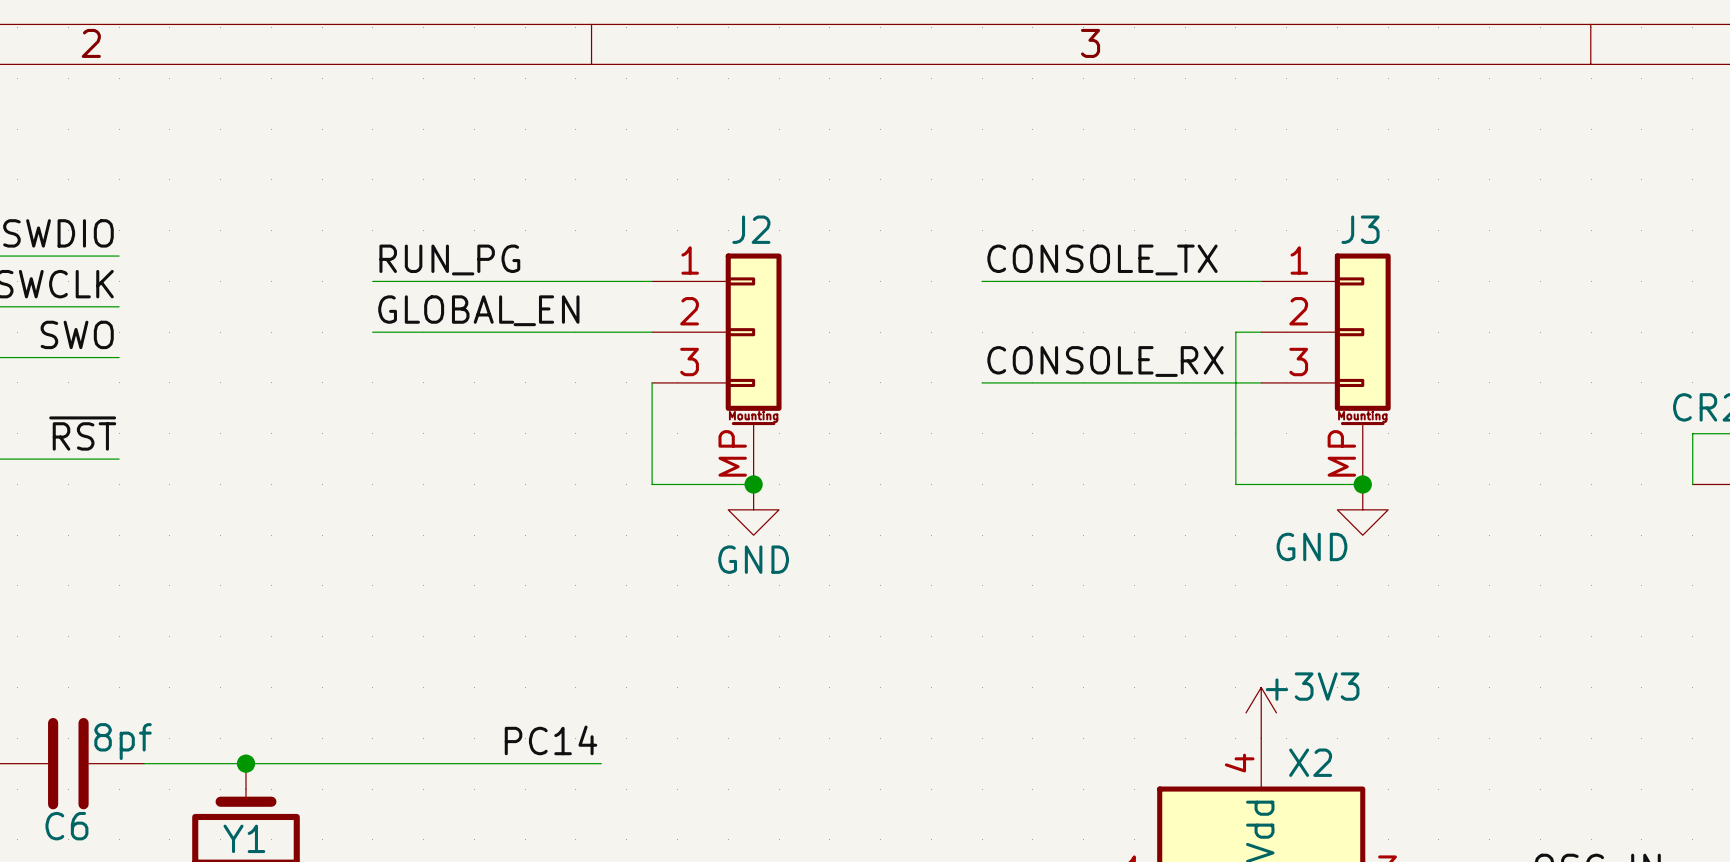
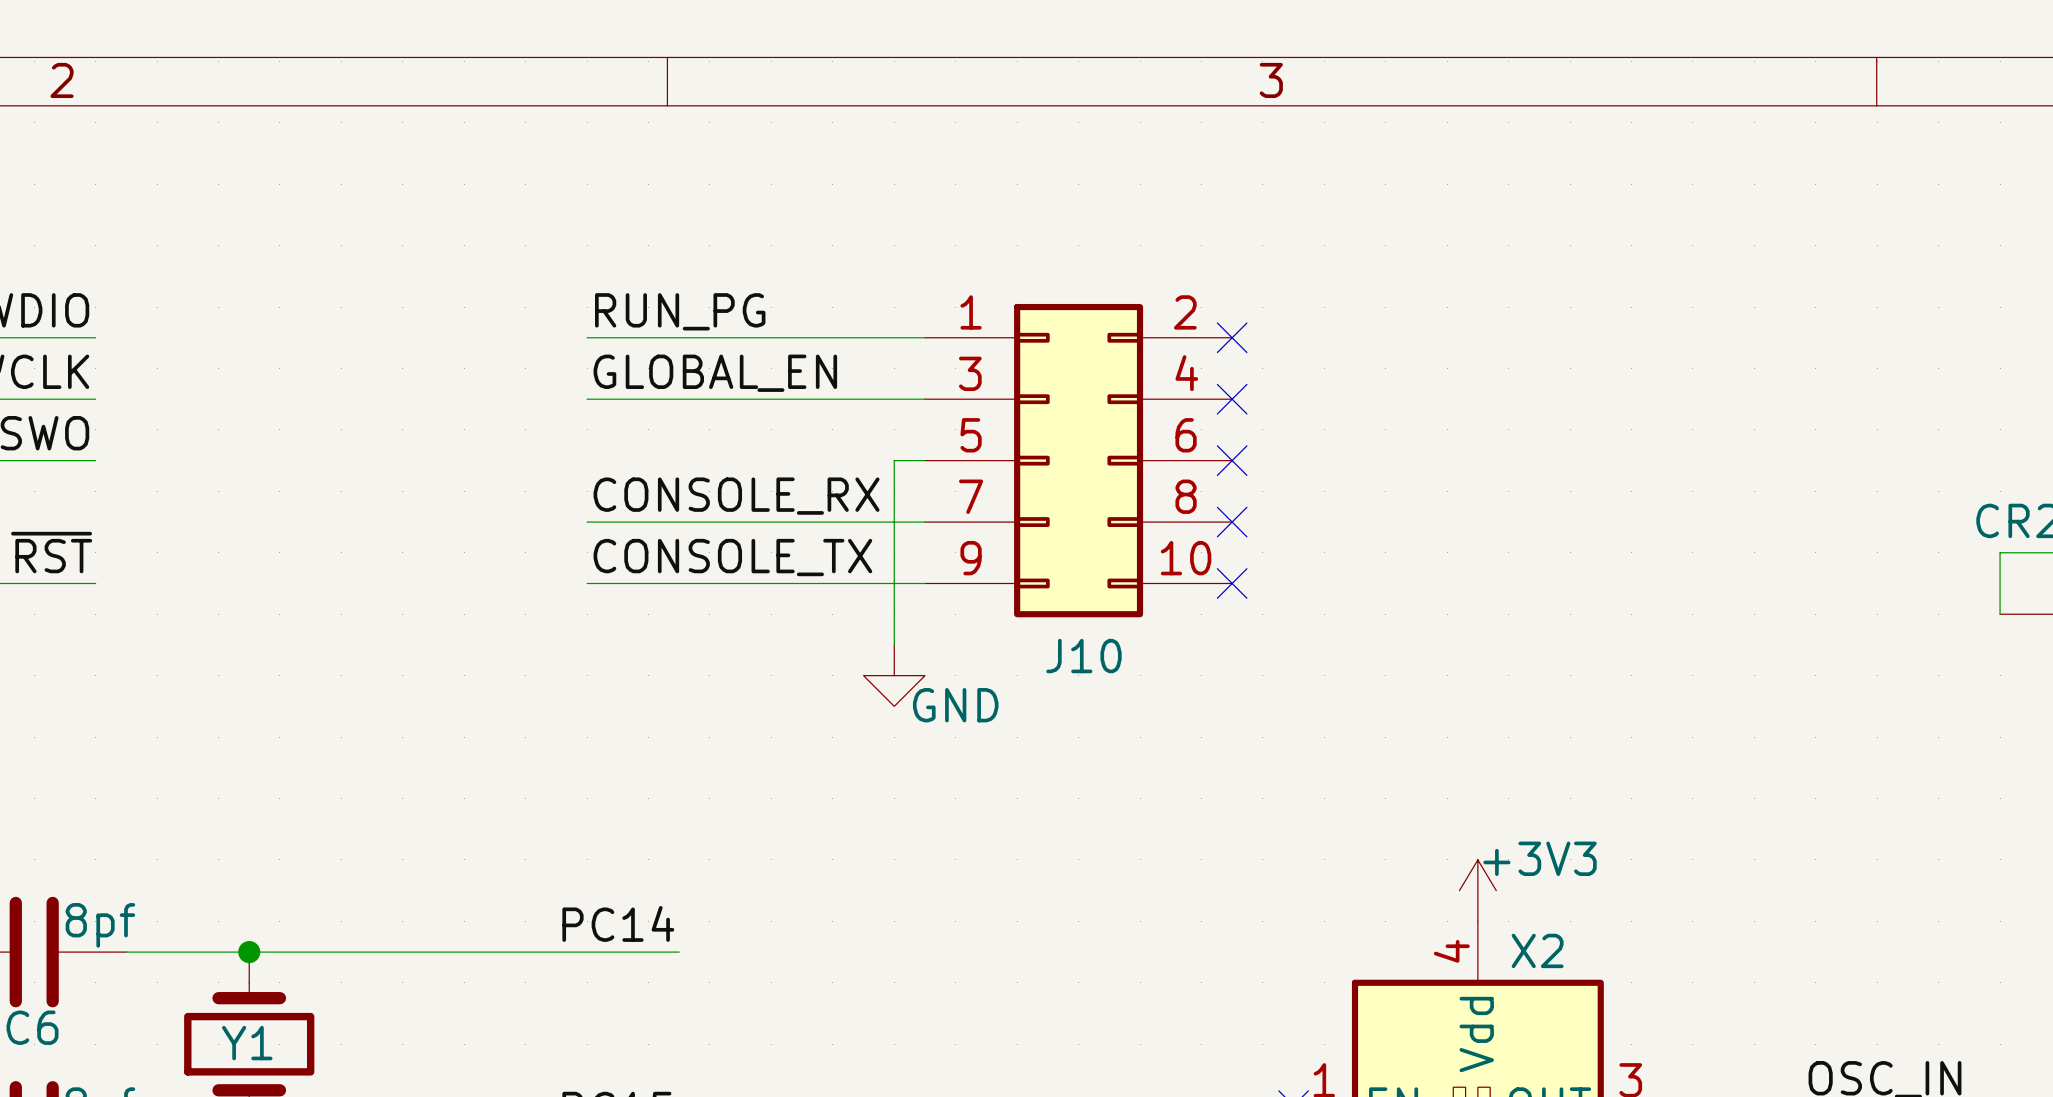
no-connect mark: none -> (1232, 337)
label position: RUN_PG (449, 259) -> RUN_PG (680, 311)
label position: CONSOLE_TX (1102, 259) -> CONSOLE_TX (732, 557)
wire: (372, 281) (652, 281) -> (587, 337) (924, 337)
wire: (982, 281) (1261, 281) -> (587, 583) (924, 583)
no-connect mark: none -> (1232, 399)
label position: GLOBAL_EN (478, 310) -> GLOBAL_EN (715, 373)
wire: (372, 332) (652, 332) -> (587, 399) (924, 399)
wire: (1261, 332) (1235, 332) (1235, 484) (1362, 484) -> none
wire: none -> (924, 460) (894, 460) (894, 644)
J10: none -> (1078, 460)
no-connect mark: none -> (1232, 460)
label position: CONSOLE_RX (1105, 361) -> CONSOLE_RX (736, 496)
J2: (716, 368) -> none
J3: (1325, 368) -> none
wire: (652, 382) (652, 484) (753, 484) -> none
wire: (982, 382) (1261, 382) -> (587, 522) (924, 522)
no-connect mark: none -> (1232, 522)
no-connect mark: none -> (1232, 583)
junction: (753, 484) -> none
junction: (1362, 484) -> none
power symbol position: GND (753, 509) -> GND (894, 675)
power symbol: GND (1362, 509) -> none
power symbol text position: GND (753, 559) -> GND (955, 705)

